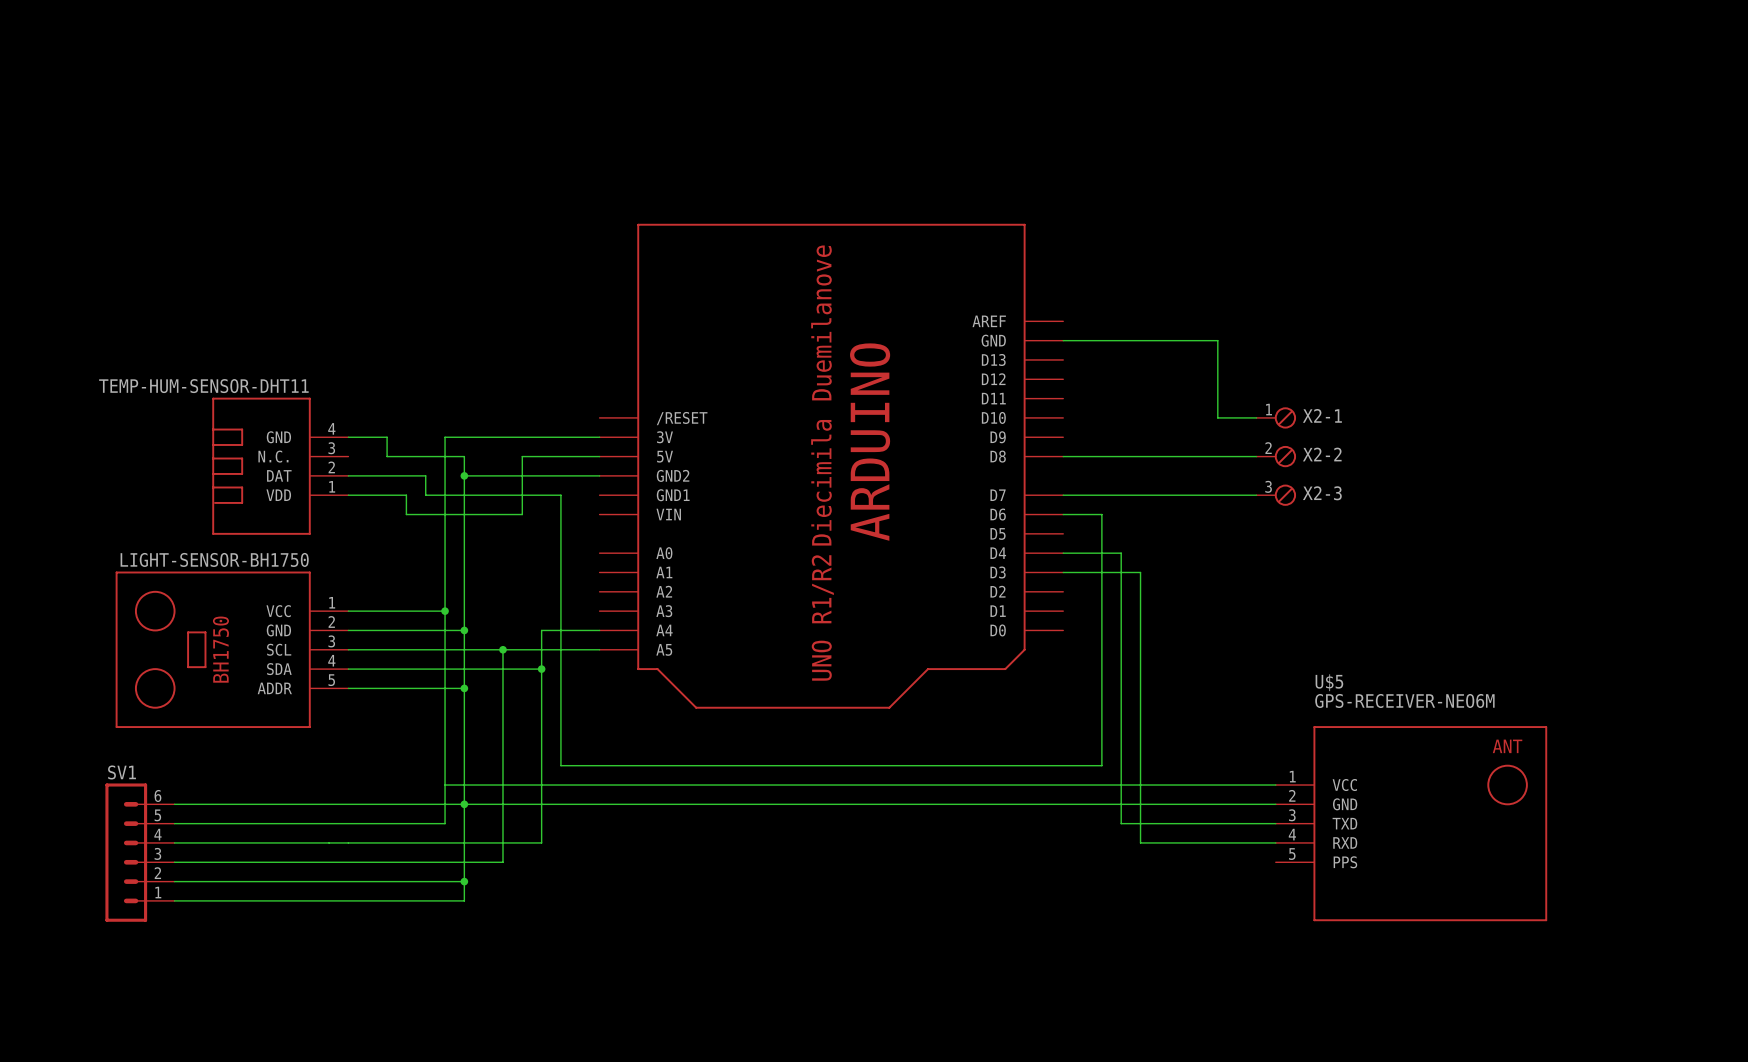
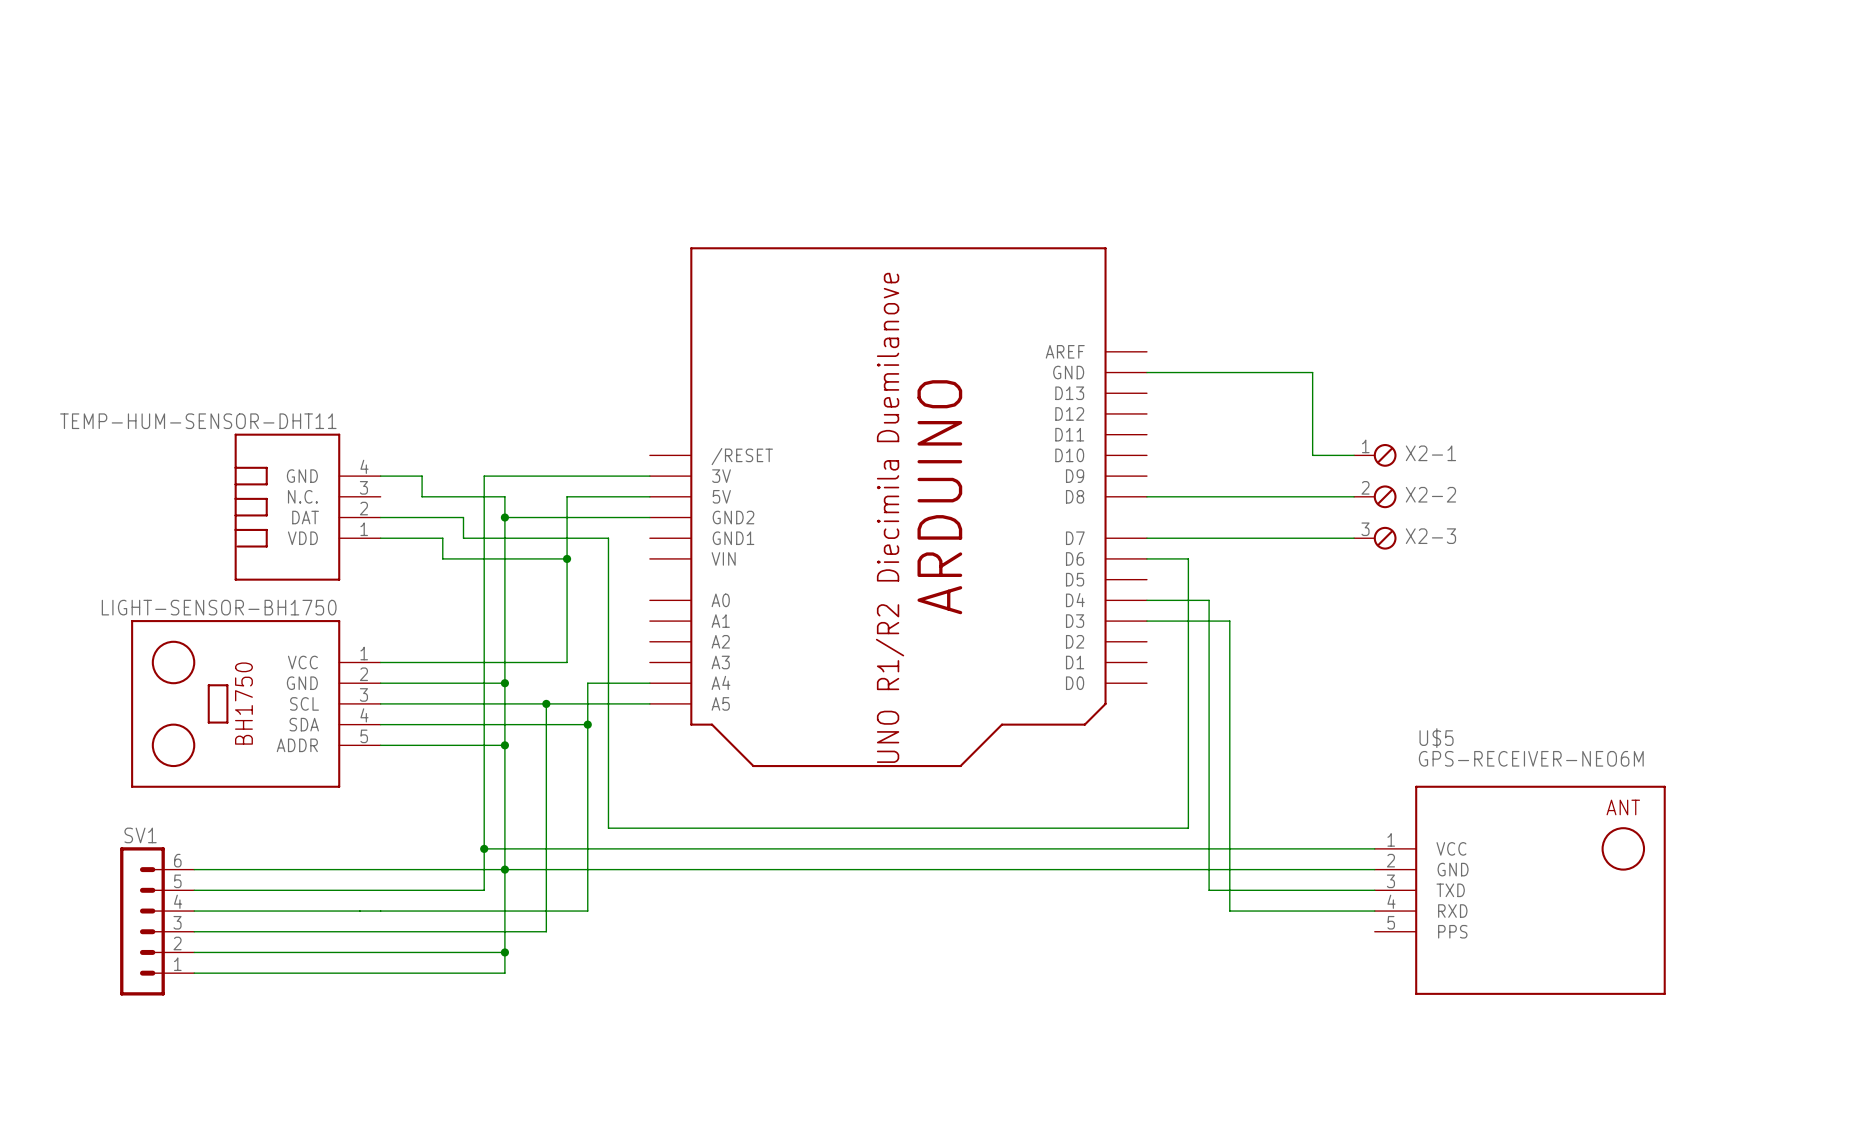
wire: none -> (567, 558) (567, 662) (484, 662)
junction: none -> (567, 558)
junction: (445, 611) -> none
junction: none -> (484, 848)

